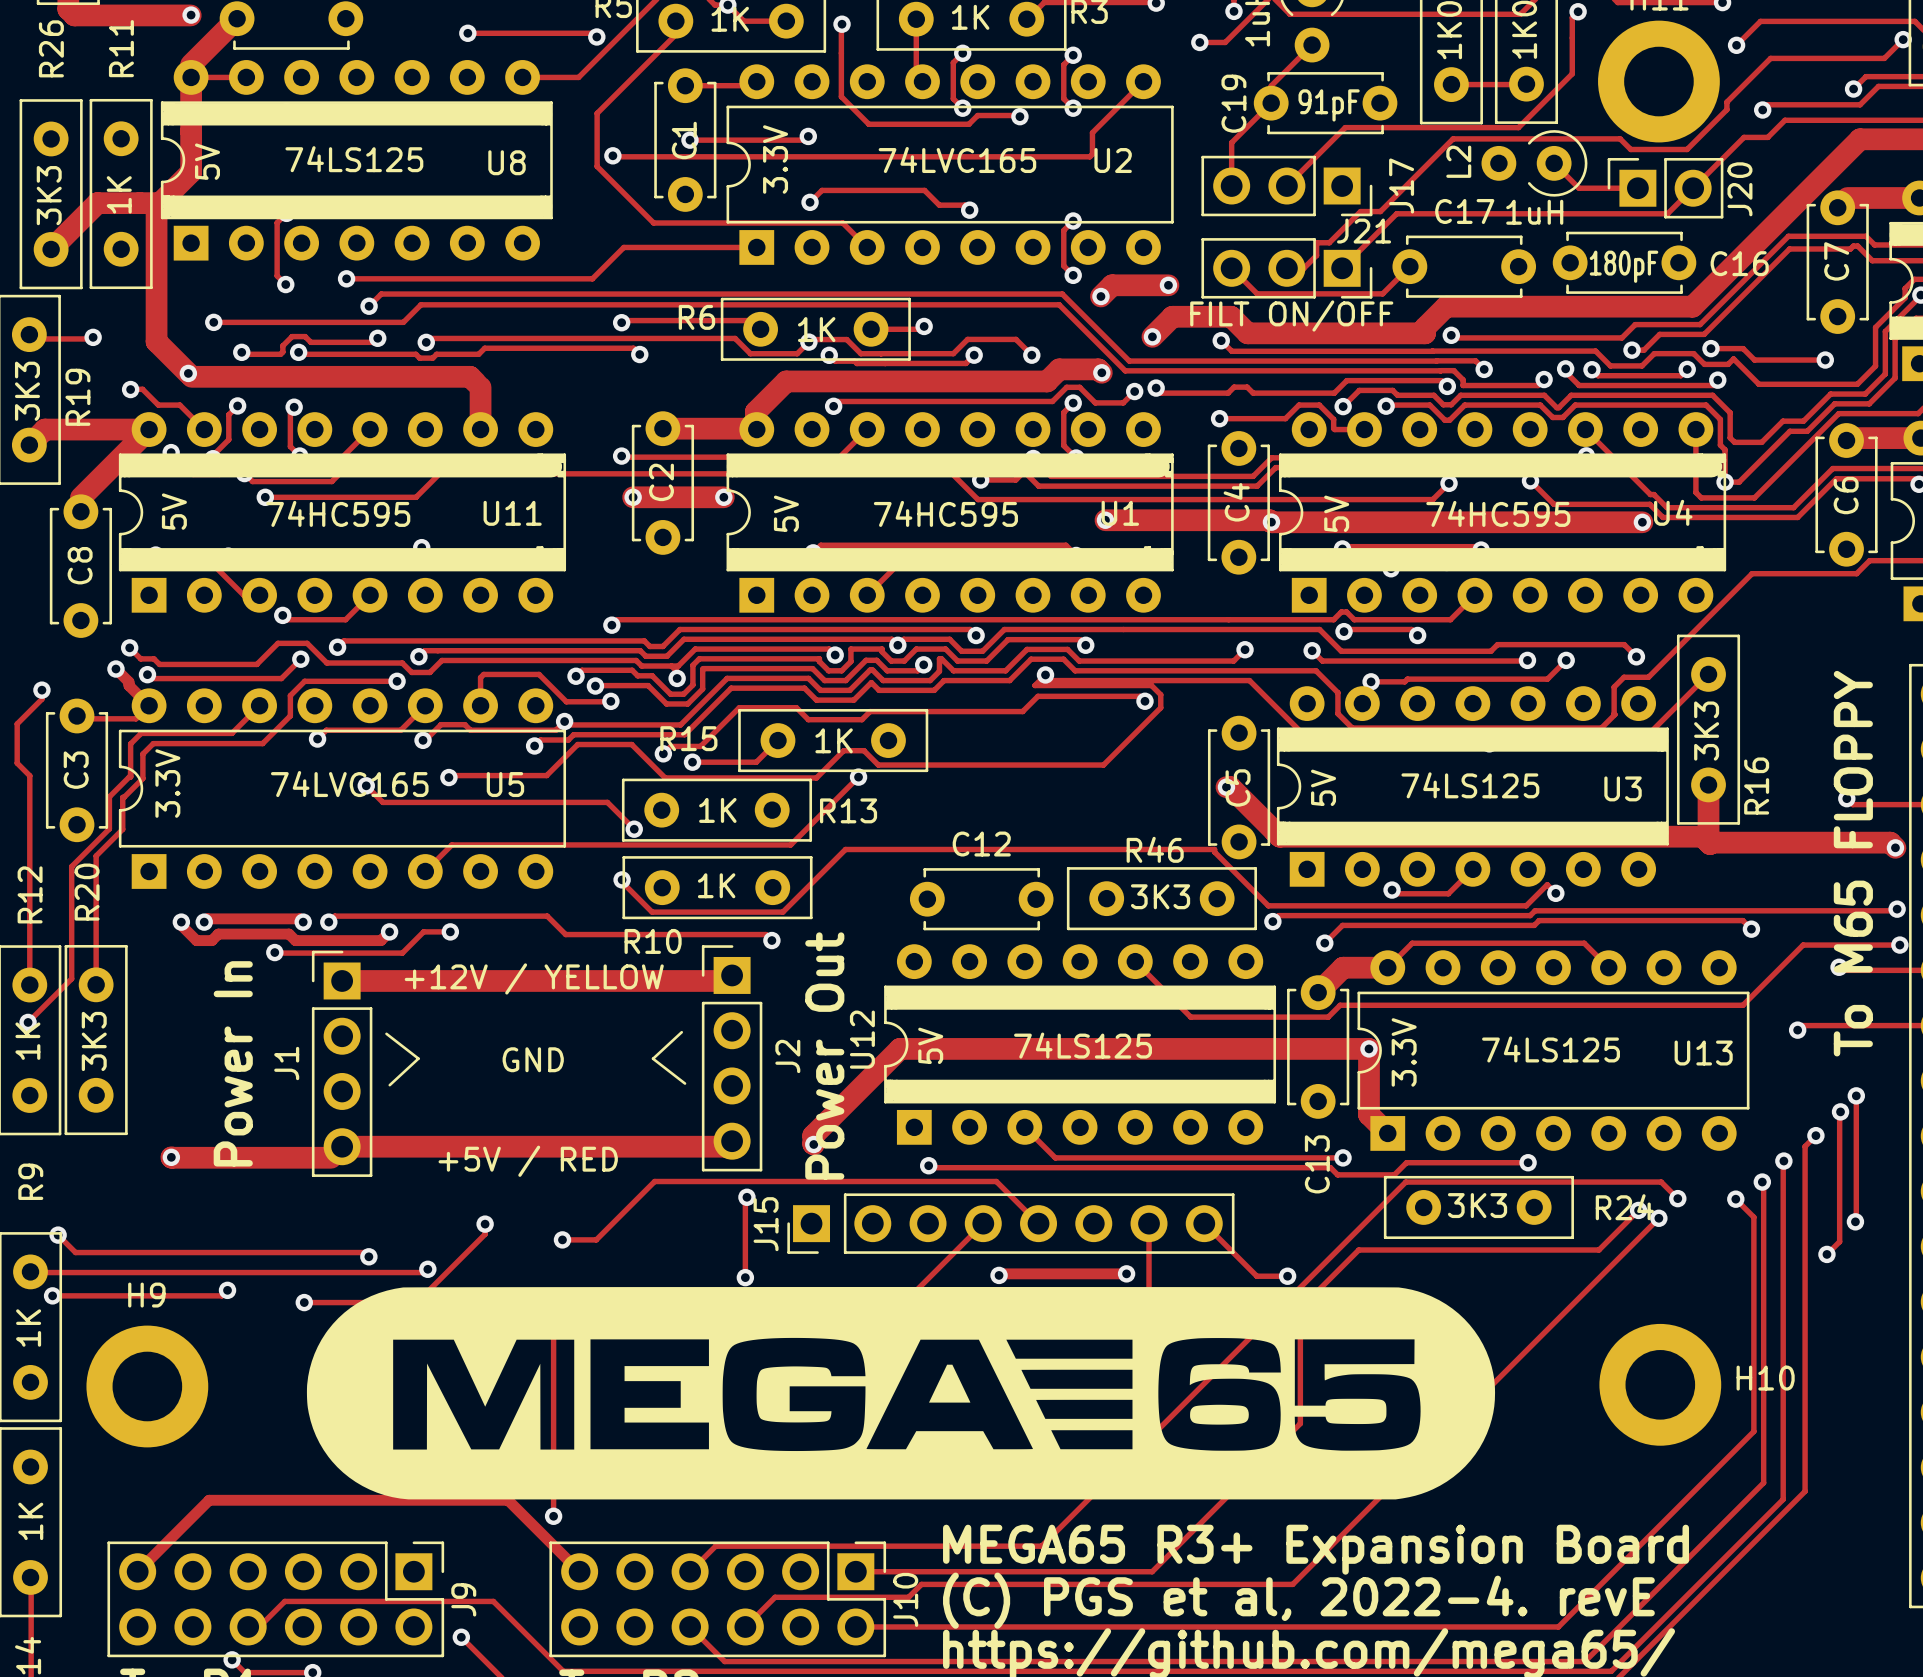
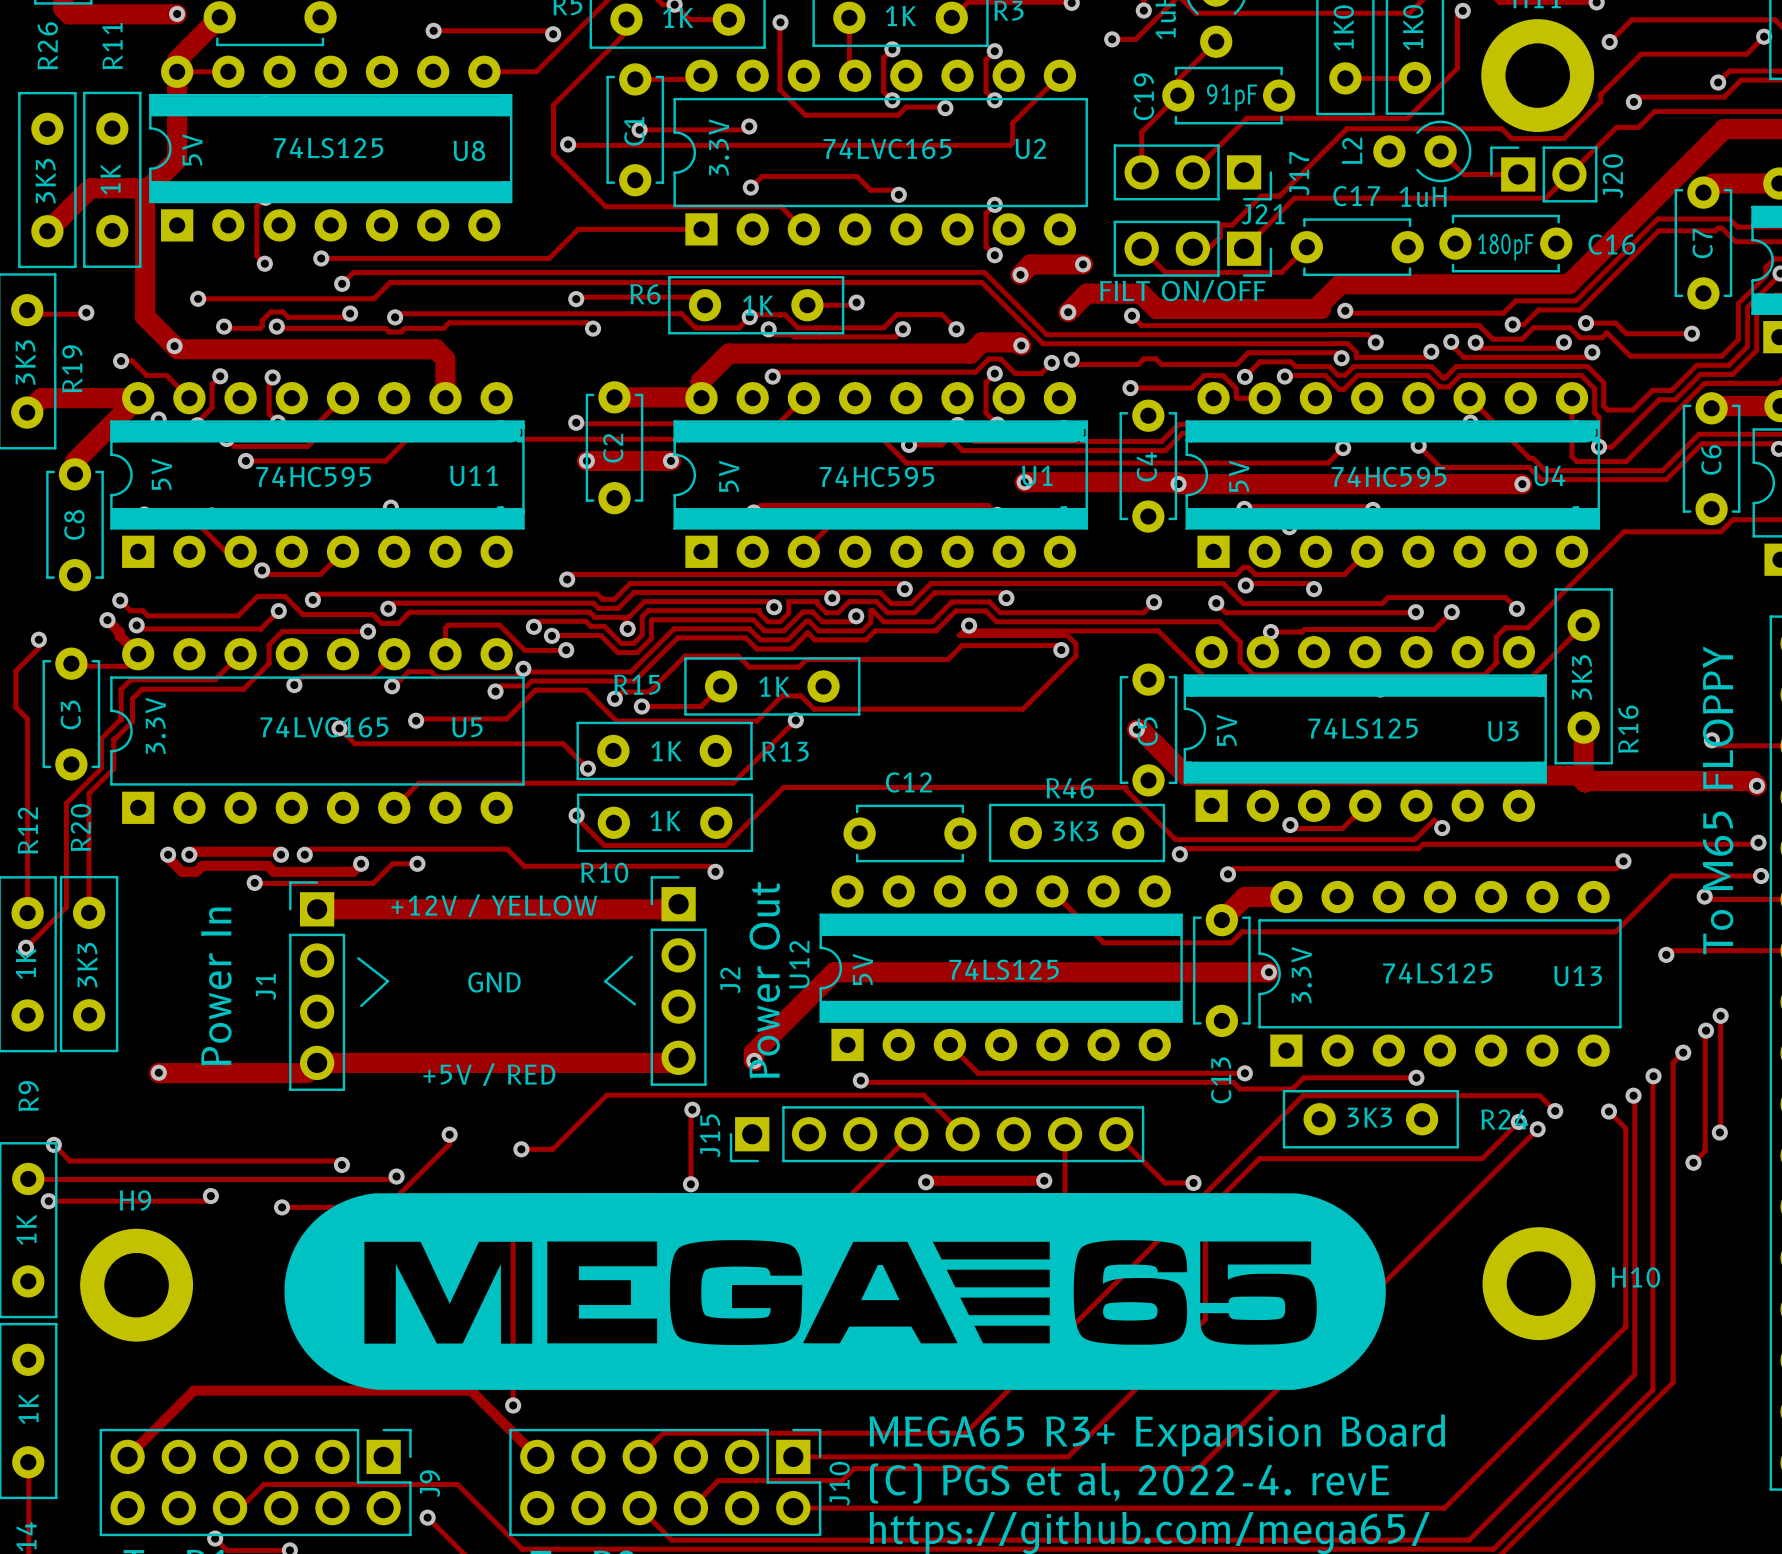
track: (1751, 929) (1742, 920) (1539, 920) (1534, 925) (1342, 925) (1330, 937) -> (1623, 861) (1616, 868) (1233, 868)
track: (1387, 967) (1412, 943) (1584, 943) (1608, 967) -> none
track: (1368, 1048) (1368, 1114) (1387, 1133) -> none

